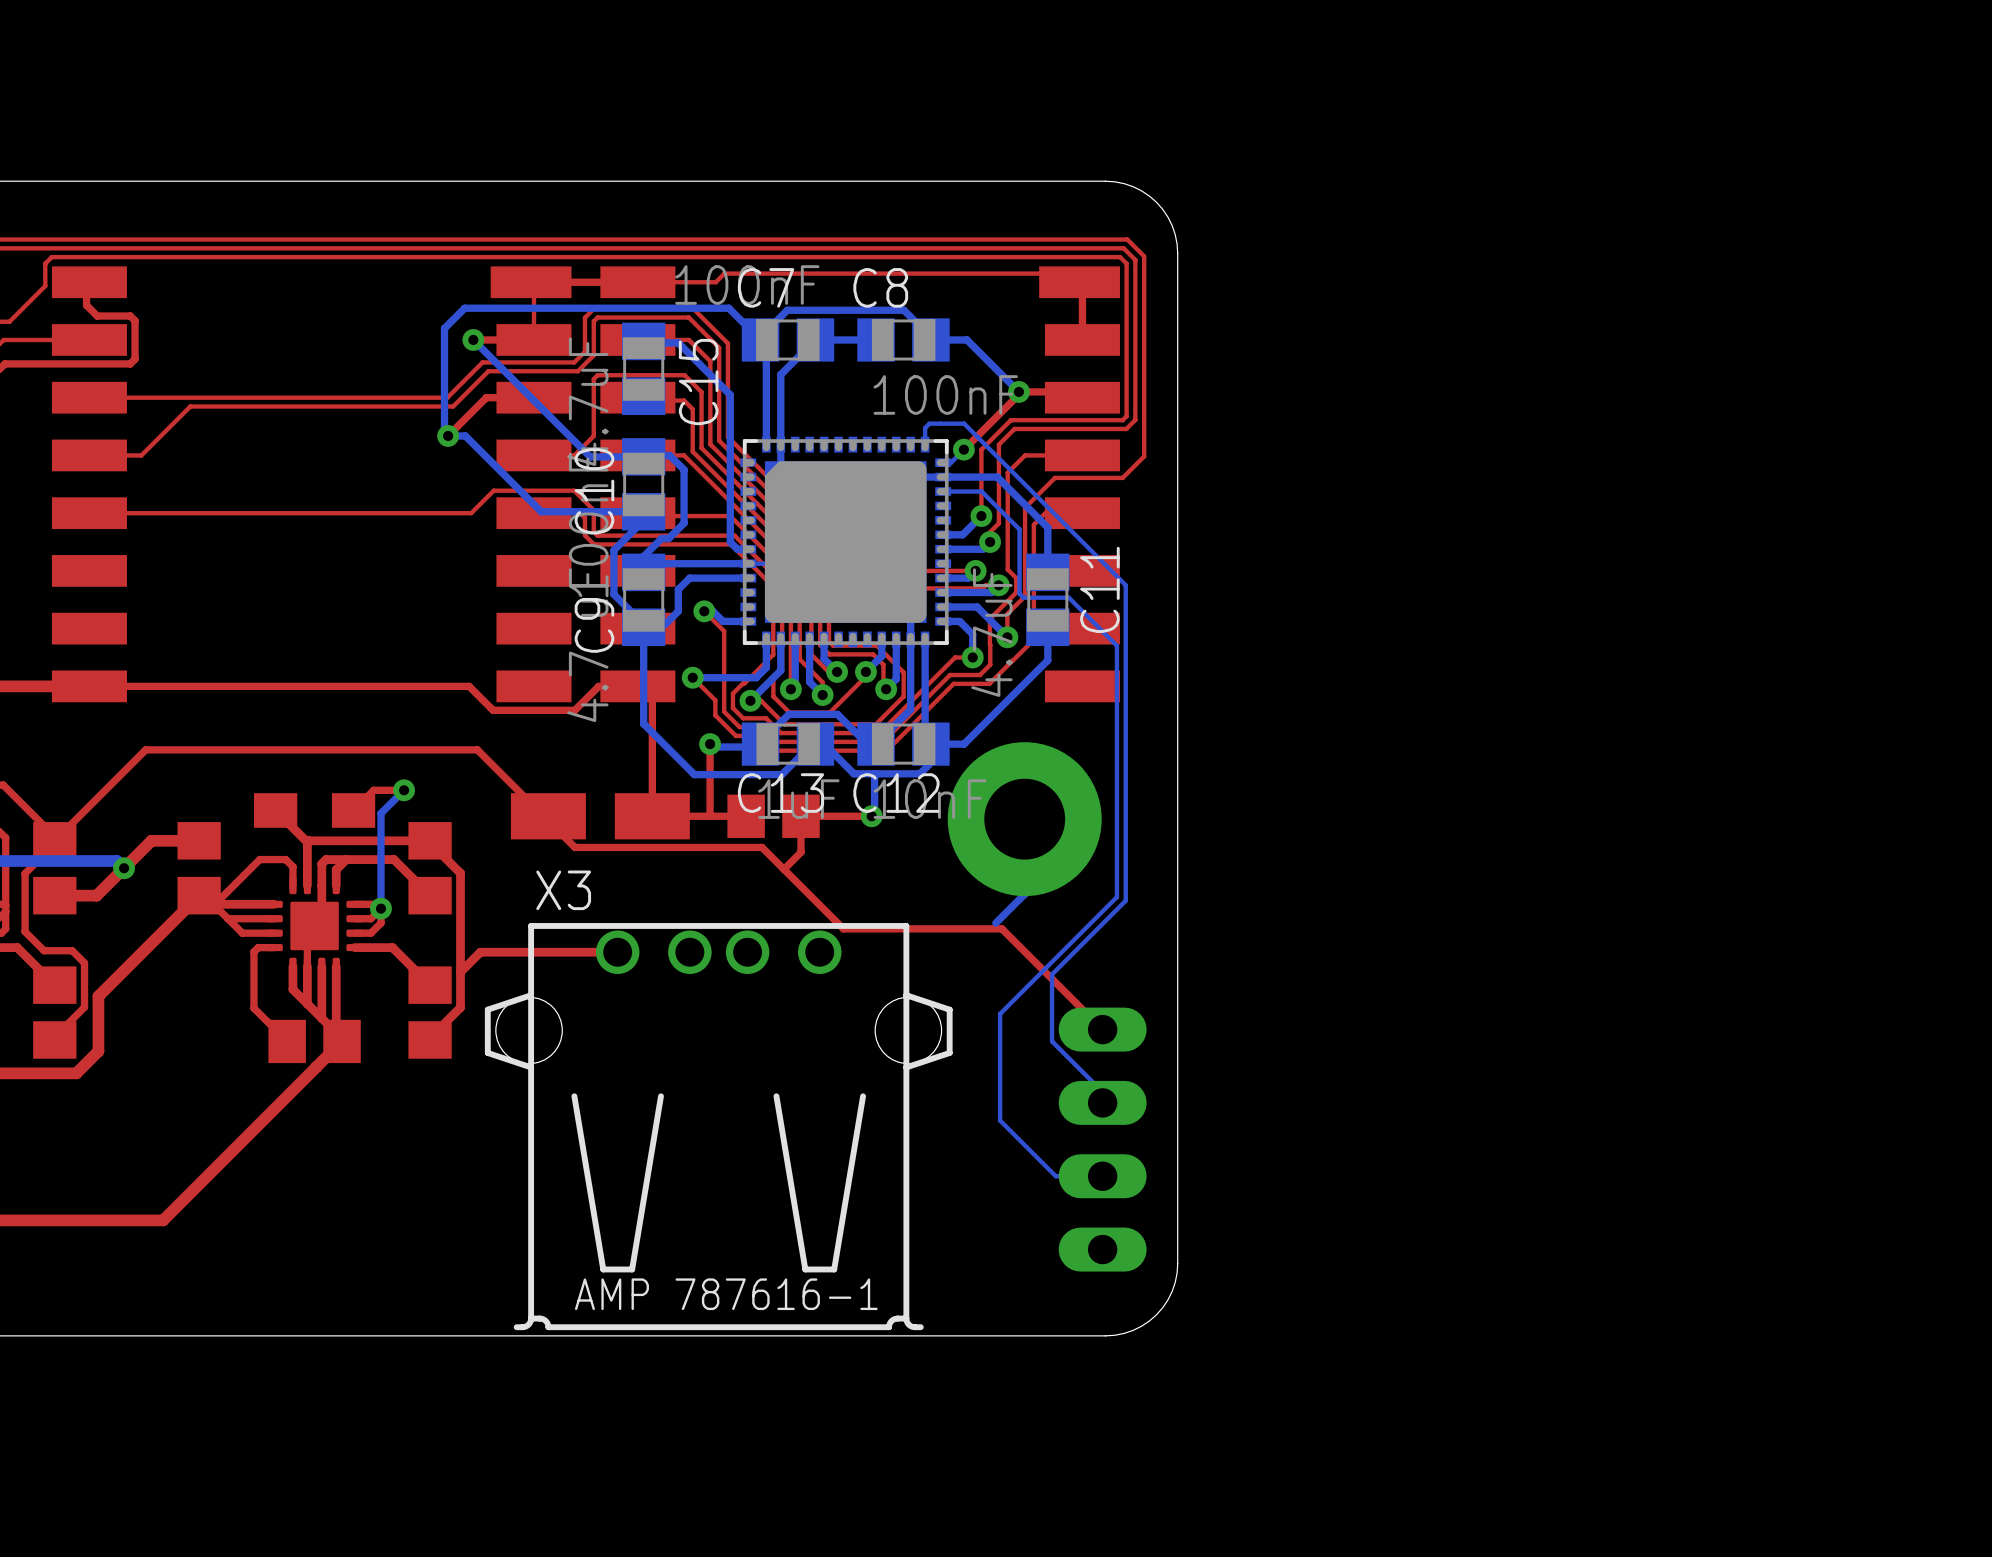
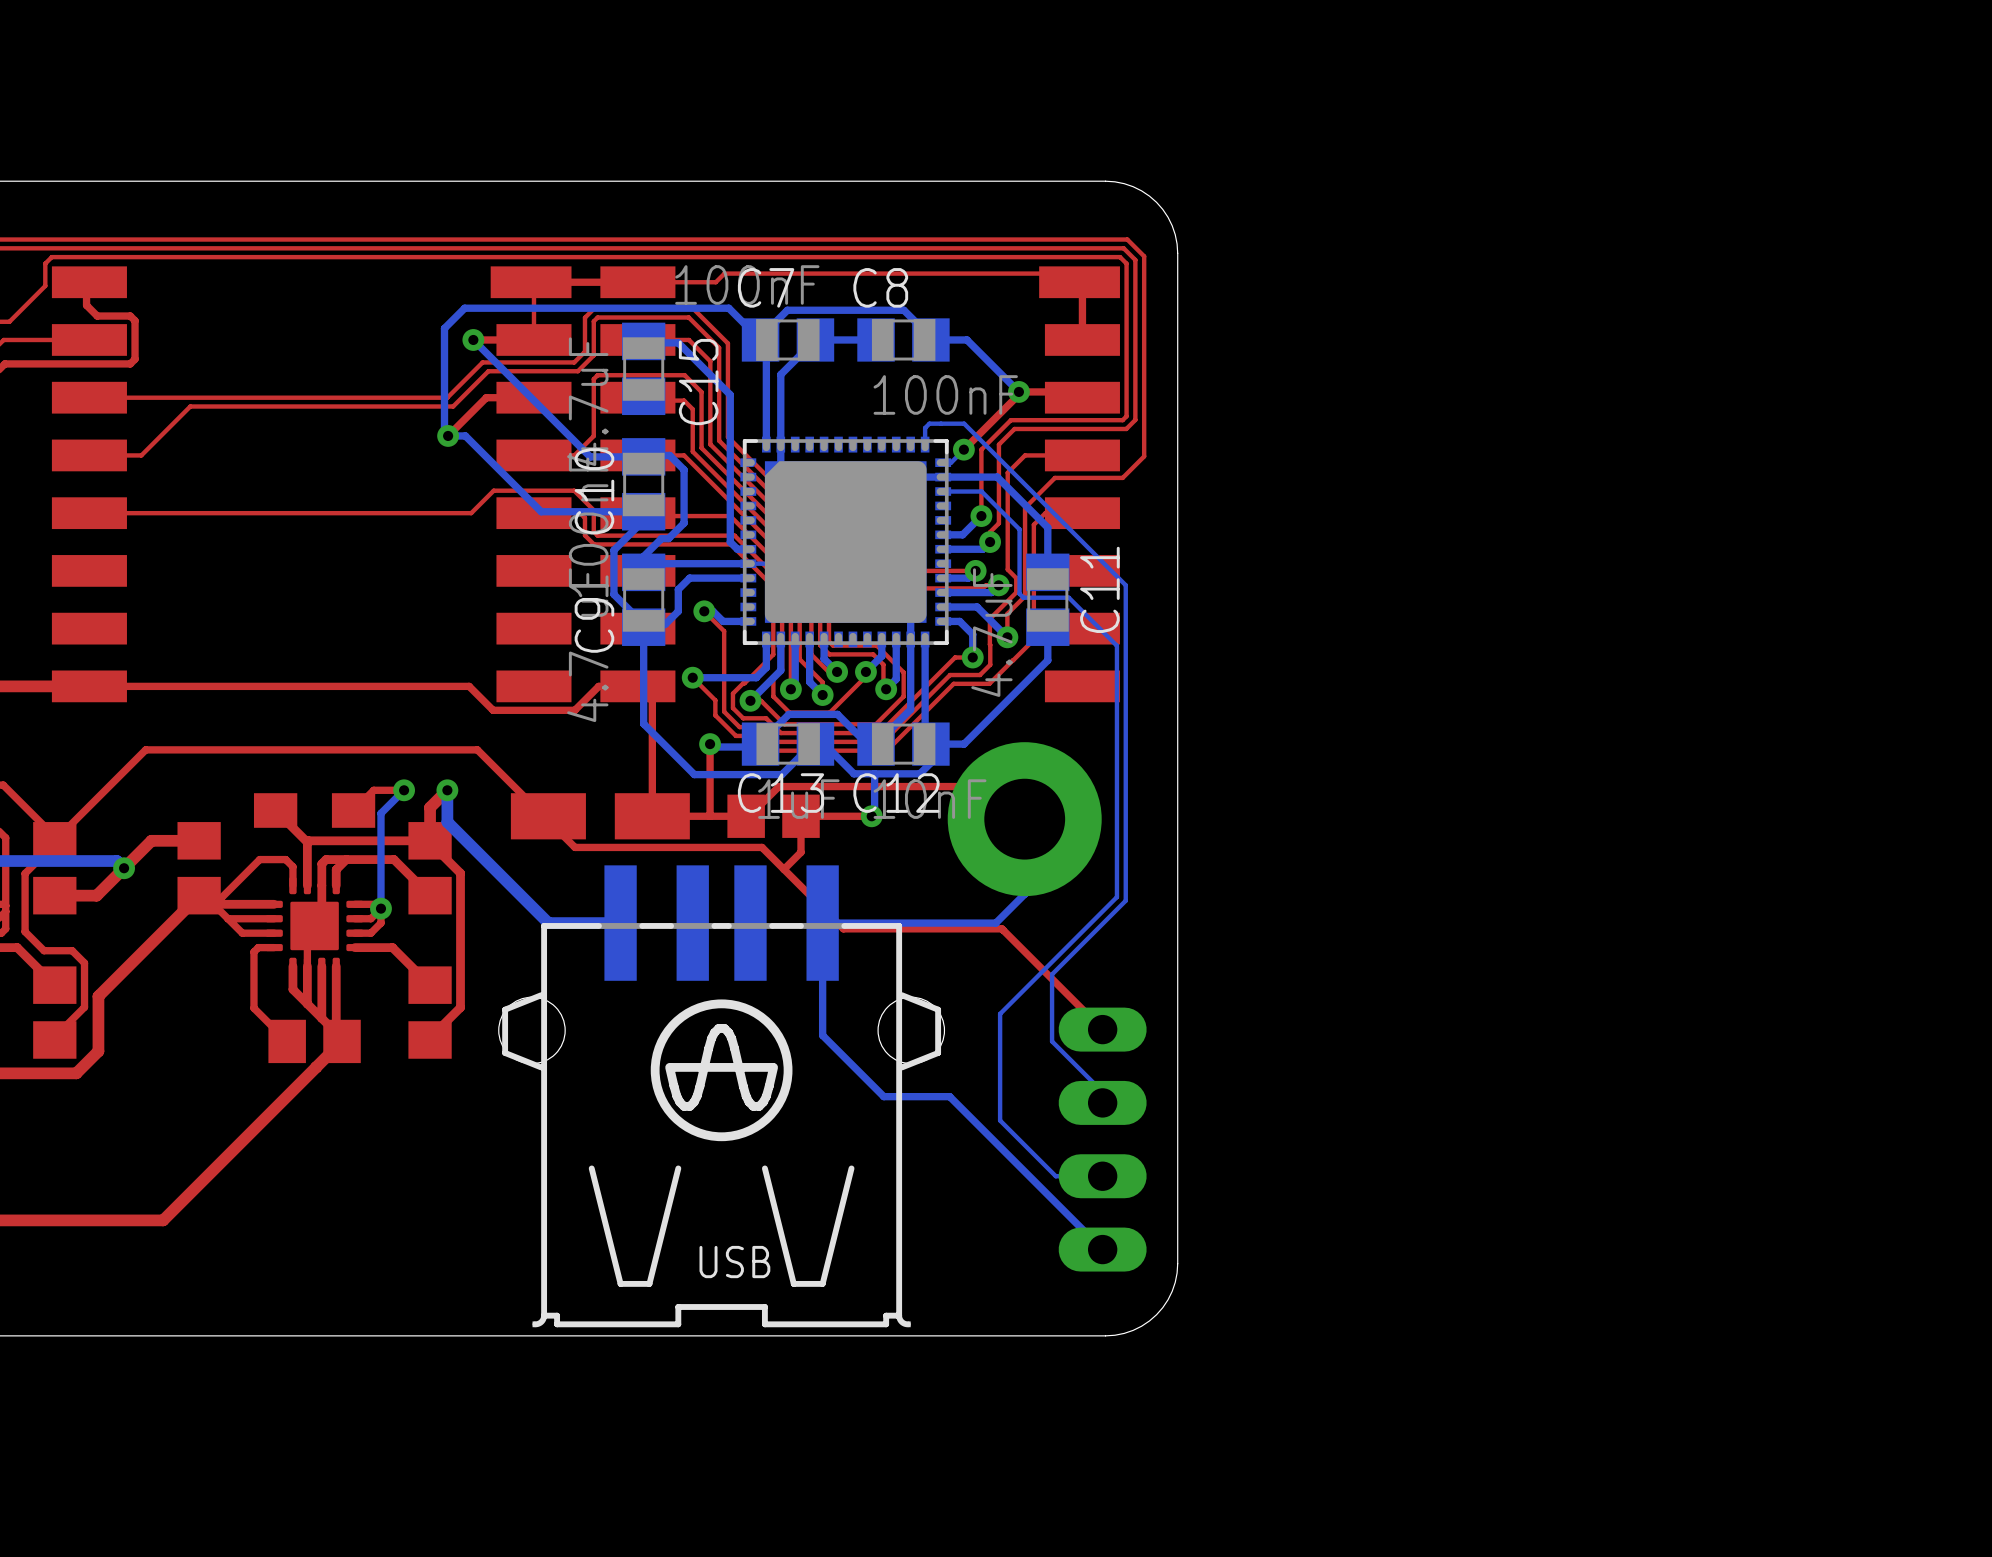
top track: none -> (992, 786) (778, 786) (749, 816)
top track: none -> (447, 790) (430, 807) (430, 840)
bottom track: none -> (447, 790) (447, 822) (548, 923) (620, 923)
via: none -> (447, 790)
bottom track: none -> (995, 923) (822, 923) (822, 1035) (883, 1096) (949, 1096) (1102, 1249)
top track: (617, 952) (480, 952) (460, 972) -> none
part: none -> (721, 1096)
X3: (718, 1126) -> none

